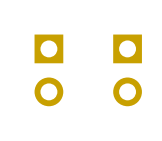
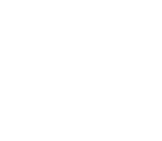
part: (48, 70) -> none
part: (127, 70) -> none

